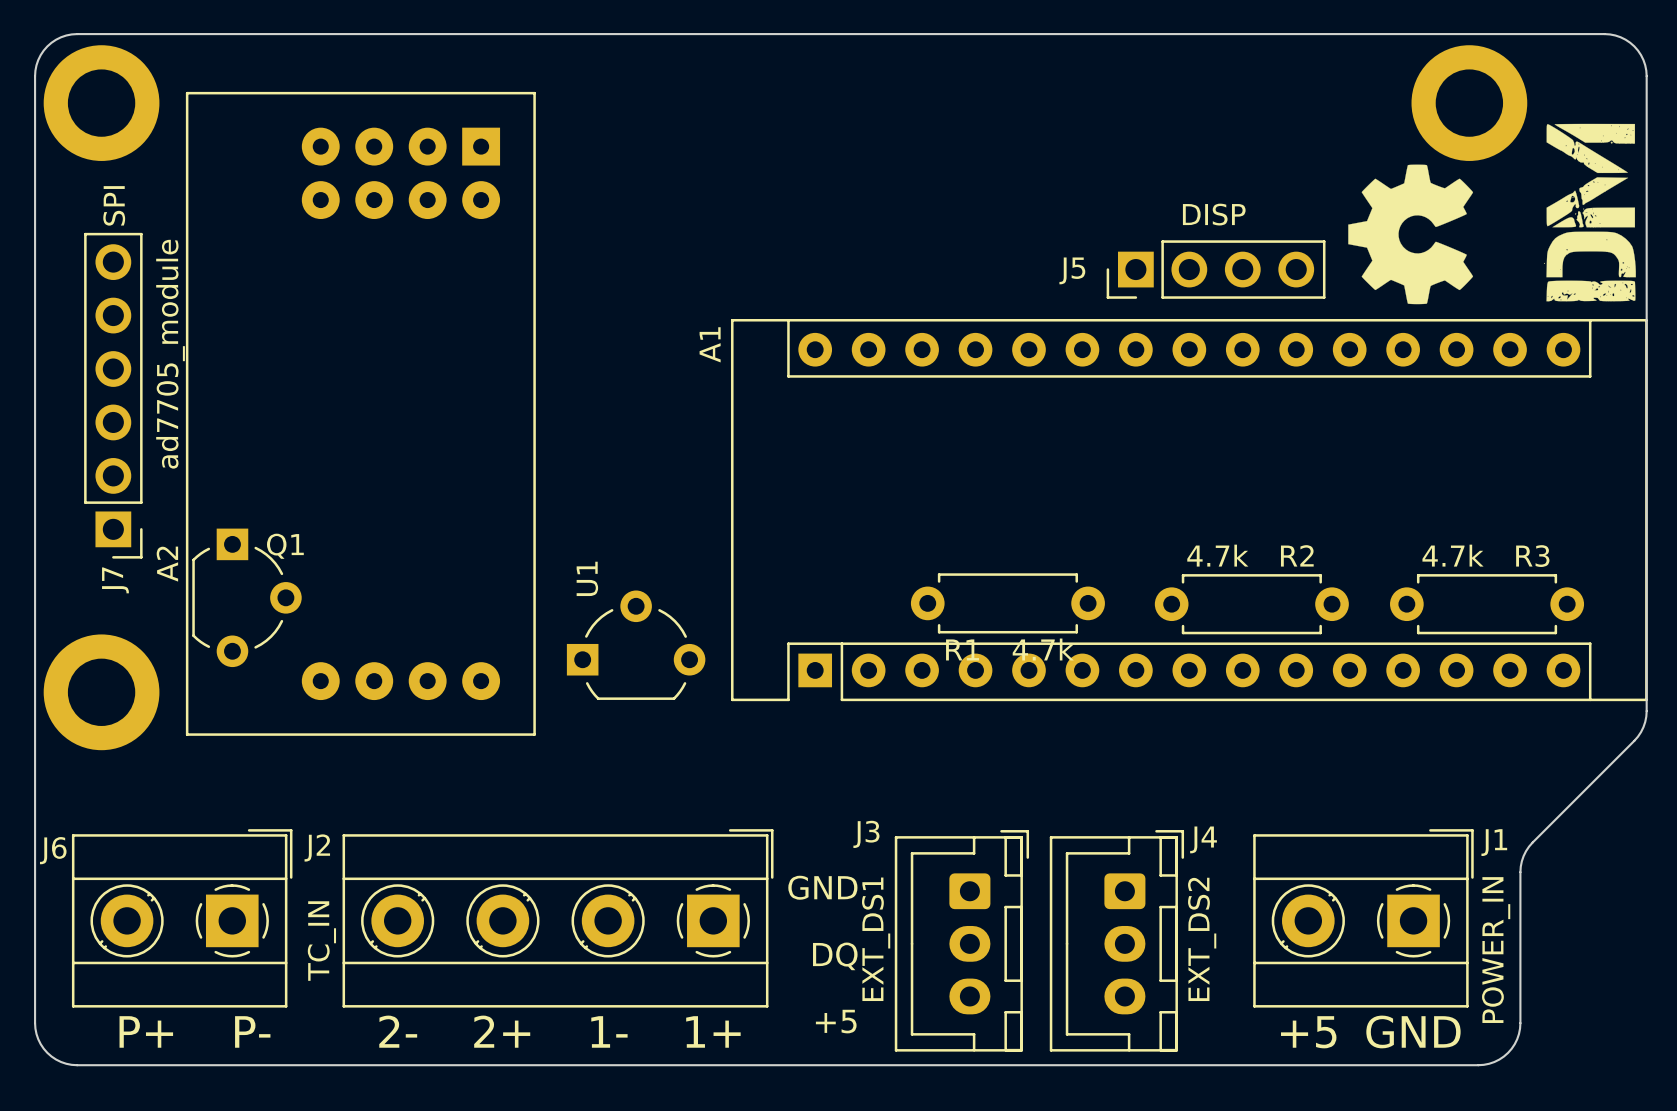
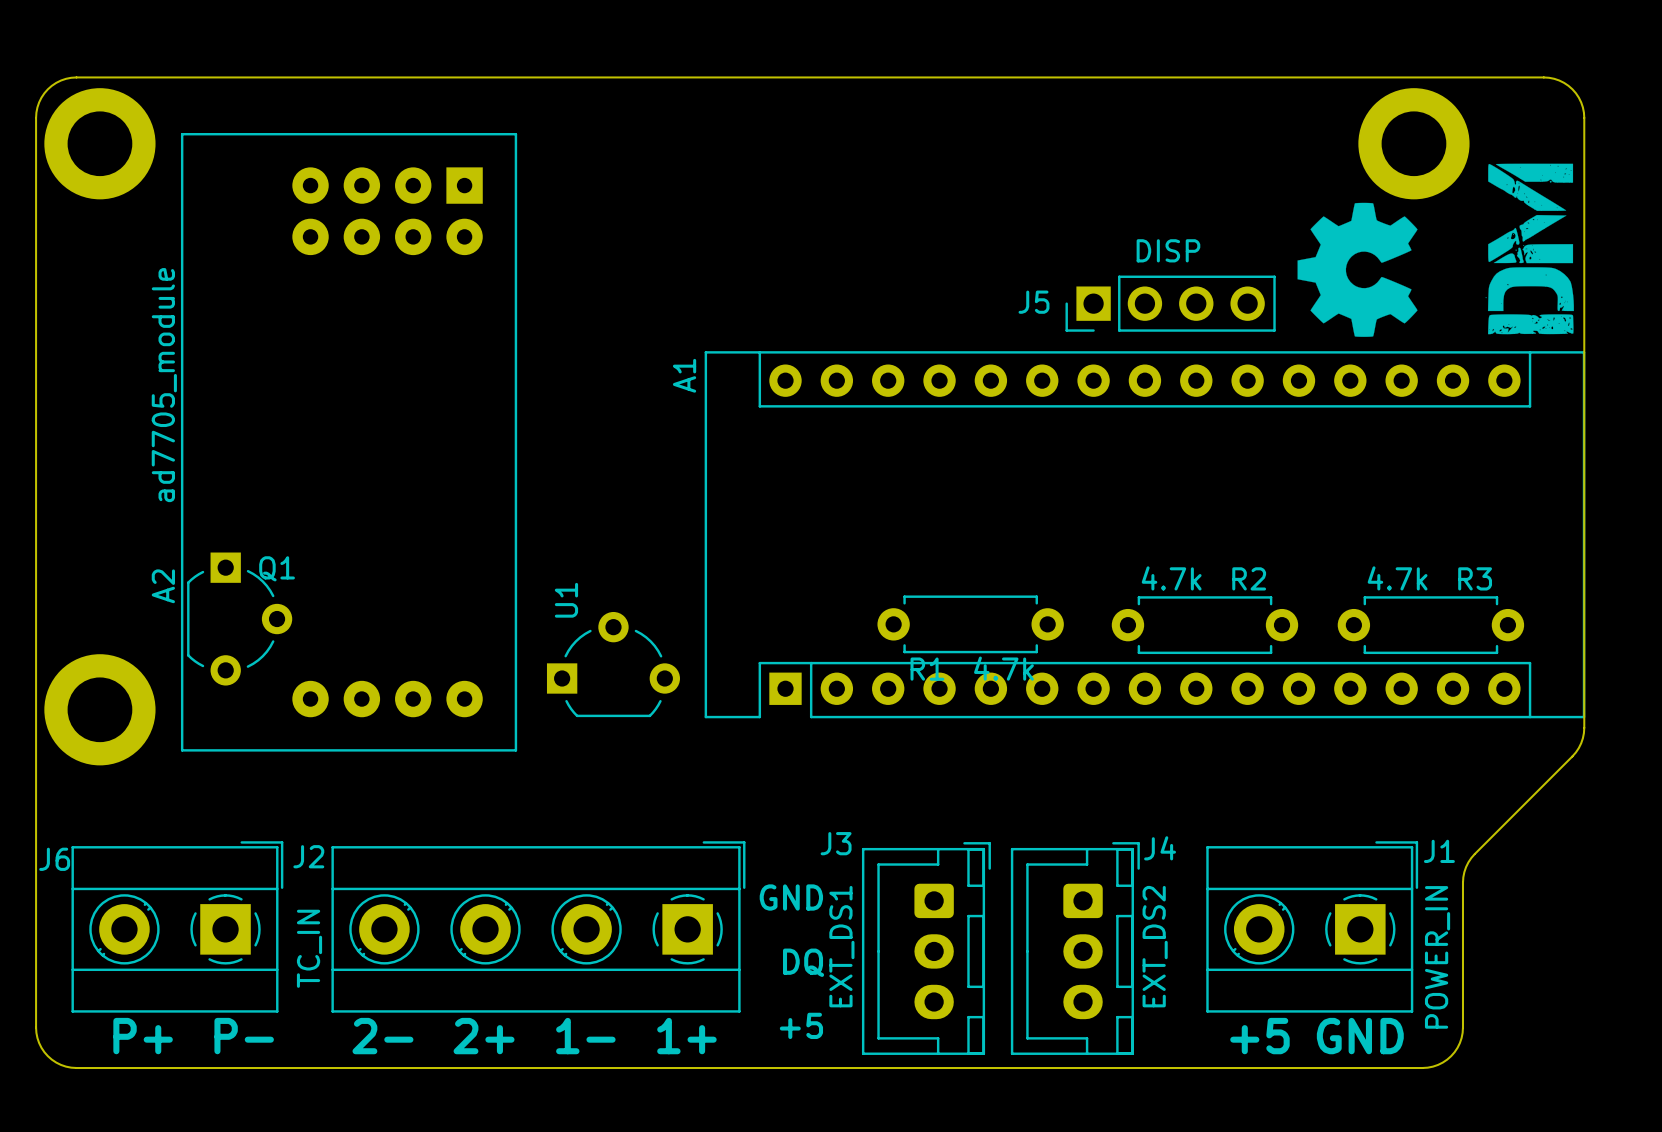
J7: SPI (113, 395) -> none

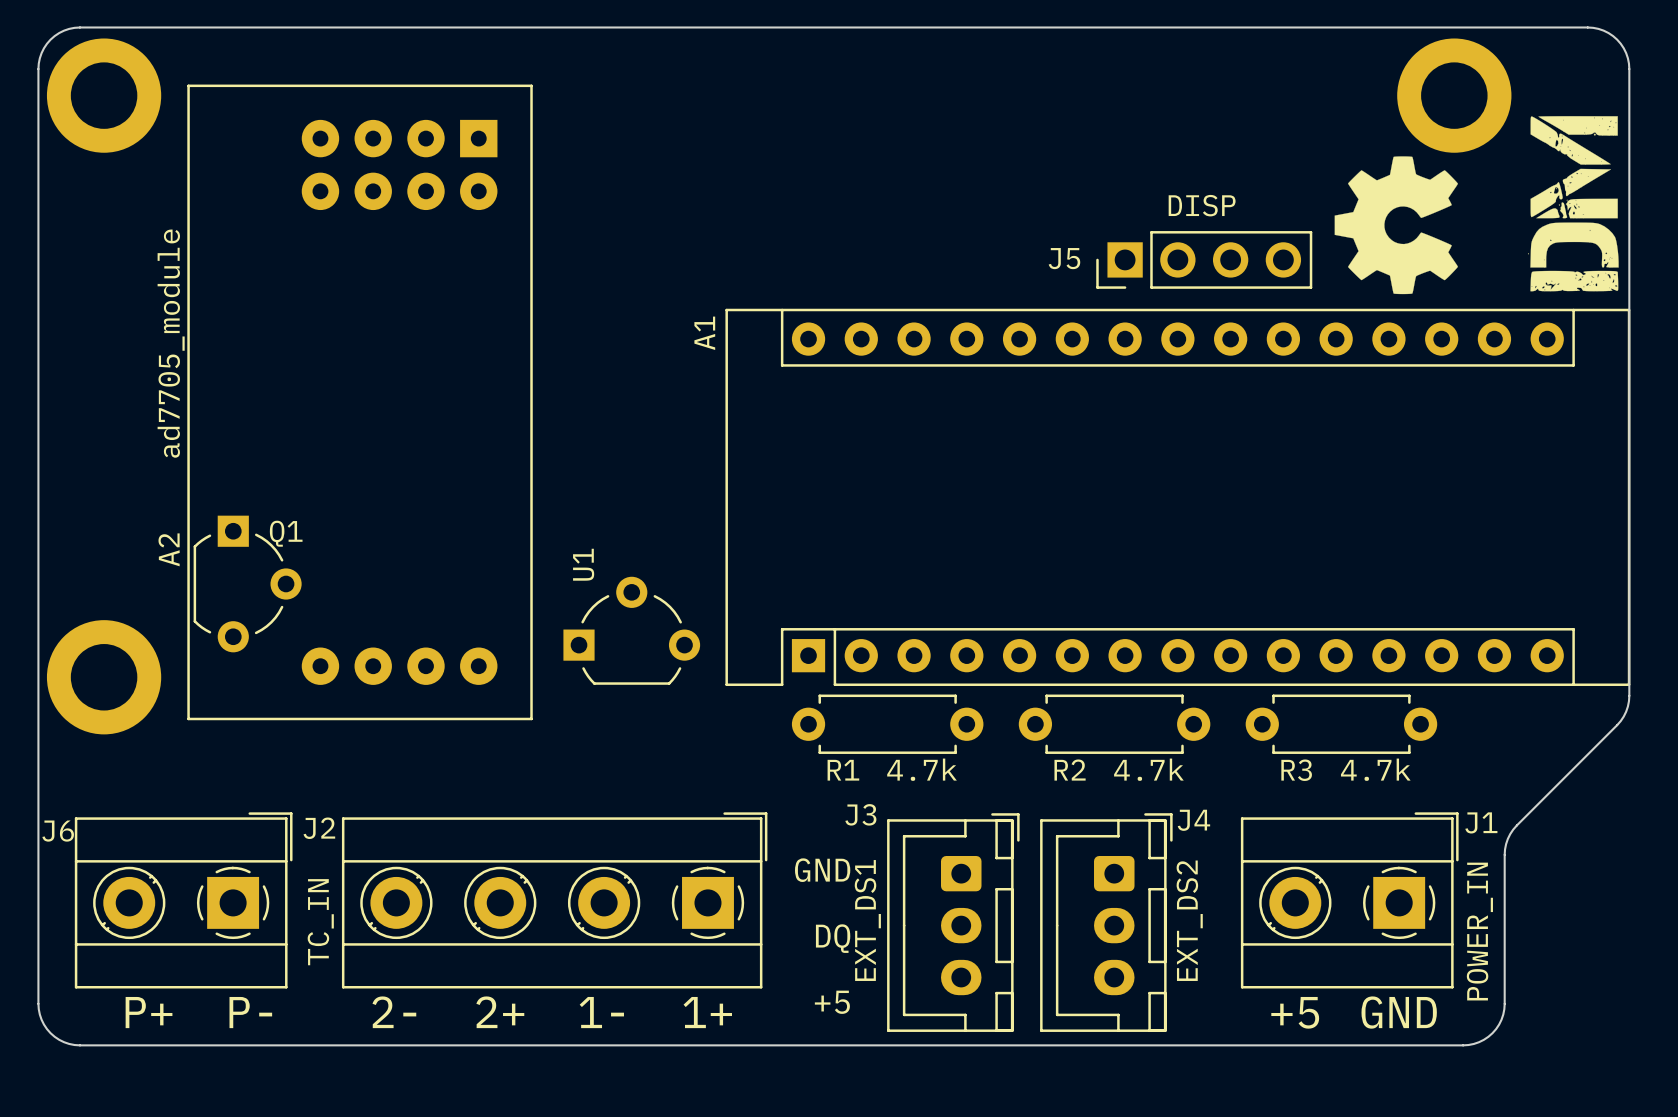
R2 value position: 4.7k (1171, 578) -> 4.7k (1148, 769)
R2 name position: R2 (1249, 578) -> R2 (1070, 770)
R3 value position: 4.7k (1397, 578) -> 4.7k (1375, 769)
R3 name position: R3 (1475, 578) -> R3 (1296, 770)
R1 position: (970, 624) -> (887, 724)
R2 position: (1204, 625) -> (1114, 724)
R3 position: (1430, 625) -> (1341, 724)

